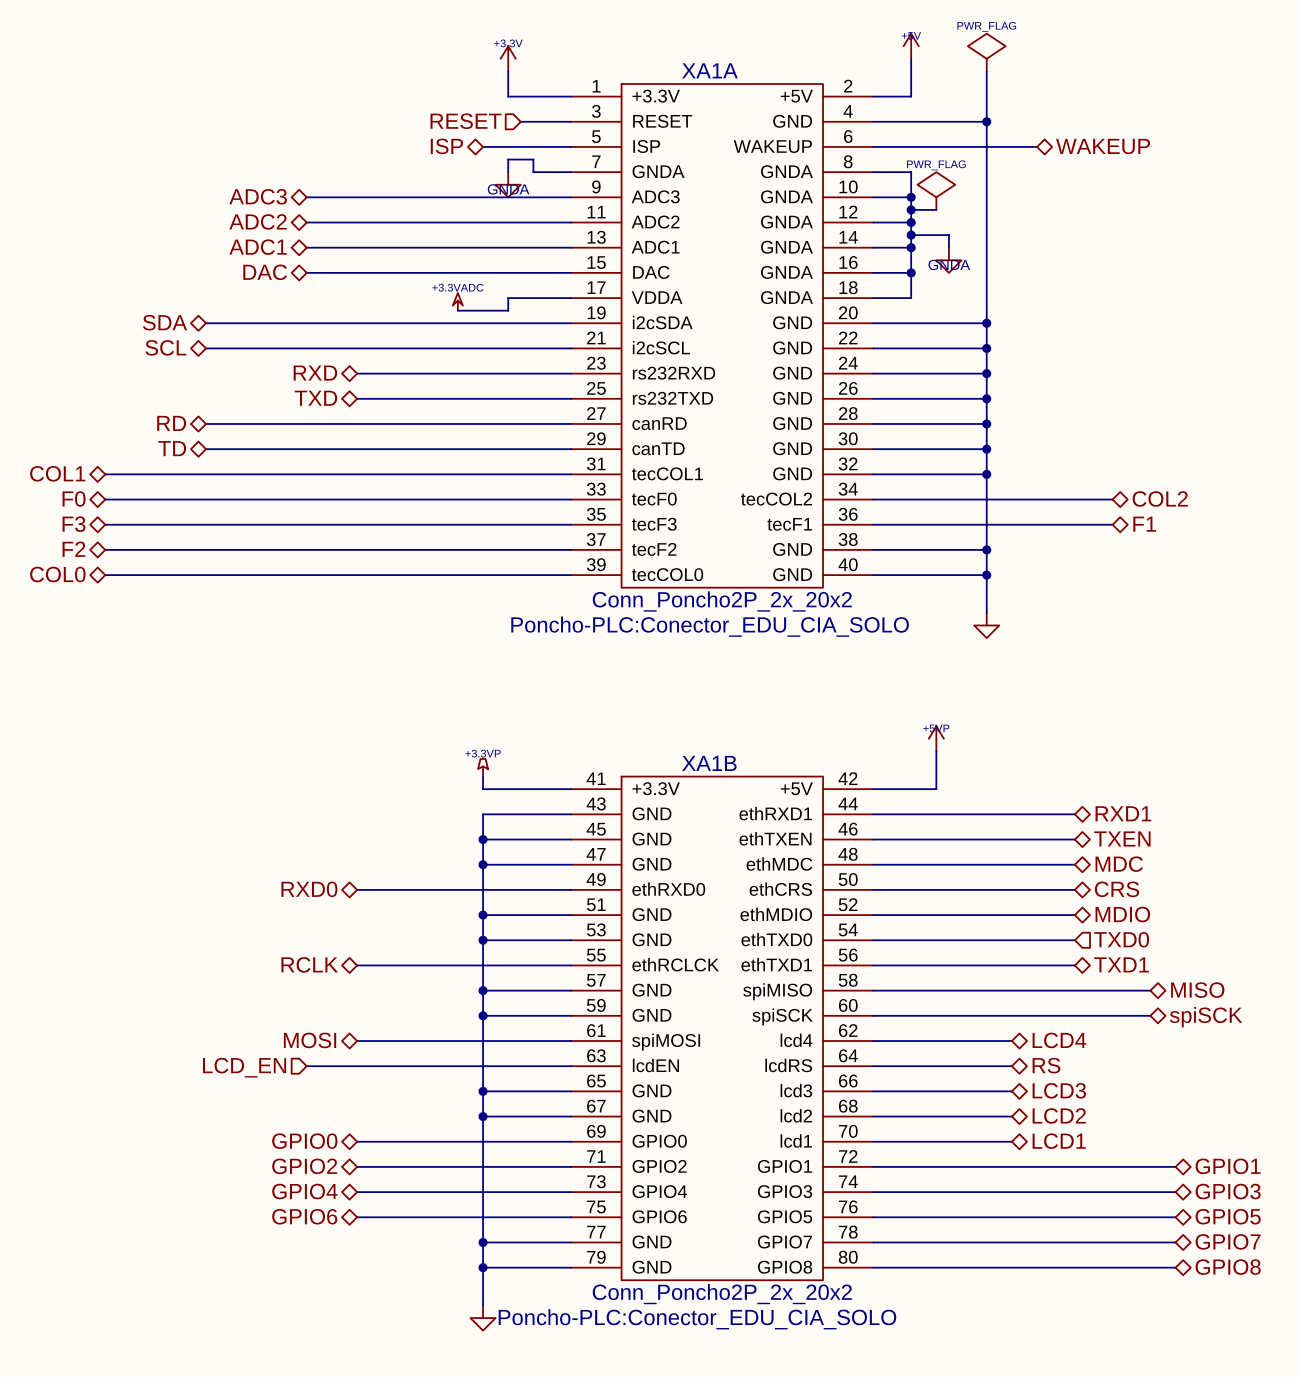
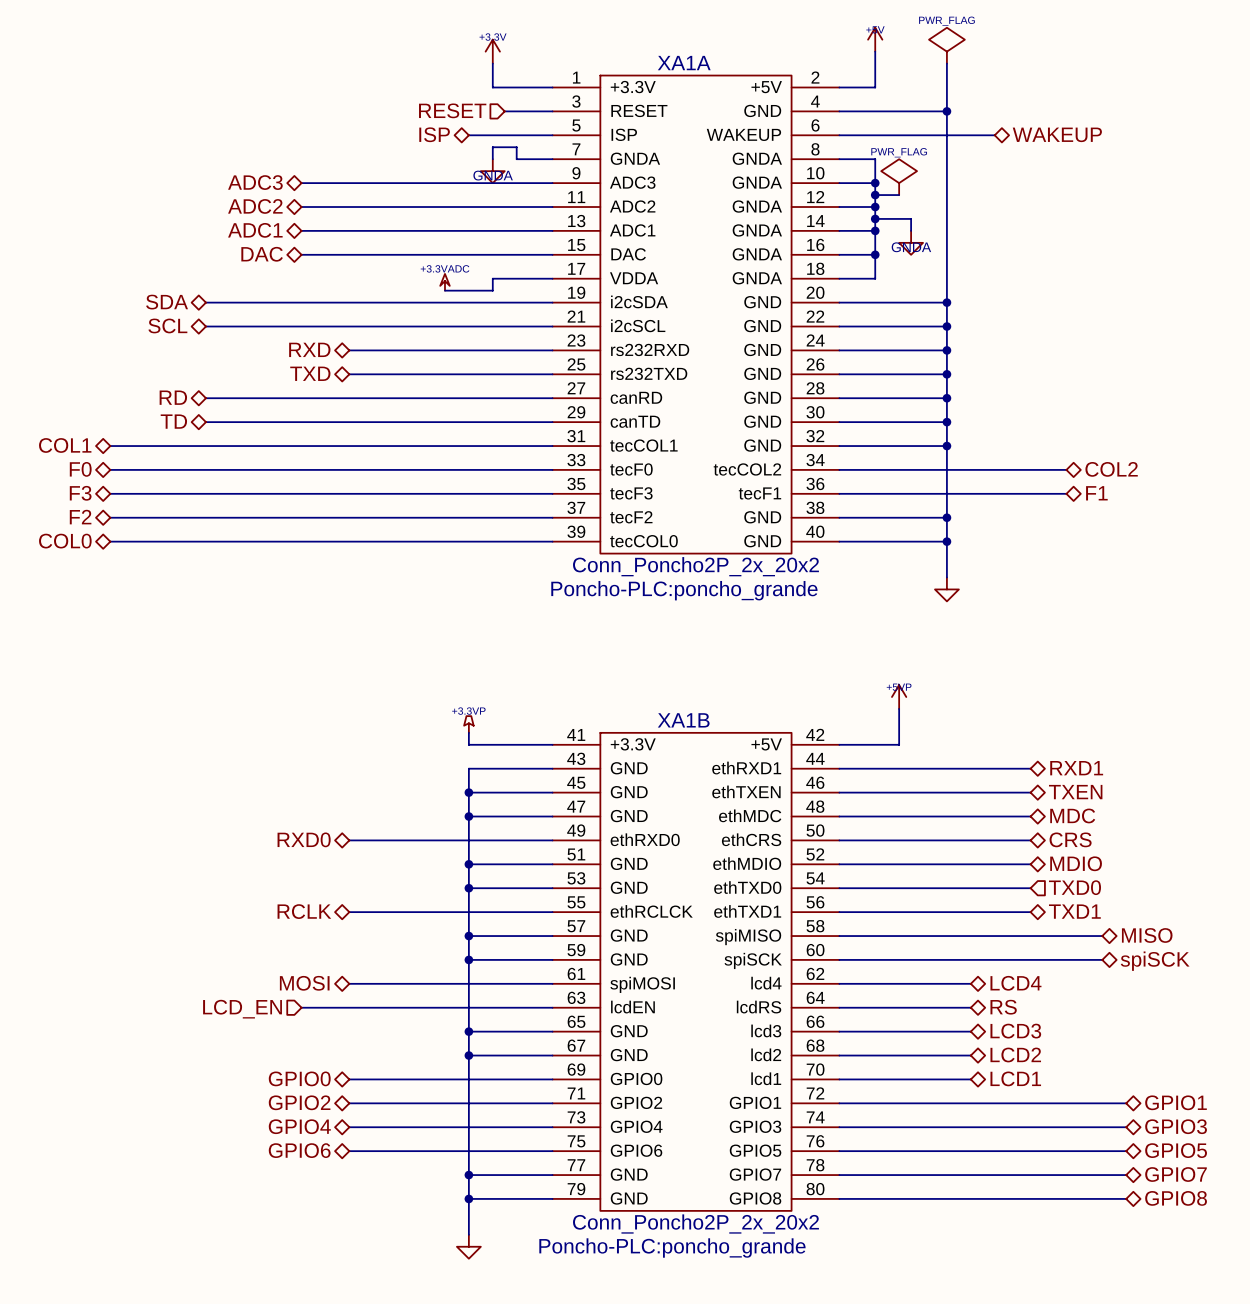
XA1A text: Poncho-PLC:Conector_EDU_CIA_SOLO (710, 626) -> Poncho-PLC:poncho_grande (684, 590)
XA1B text: Poncho-PLC:Conector_EDU_CIA_SOLO (697, 1319) -> Poncho-PLC:poncho_grande (672, 1248)

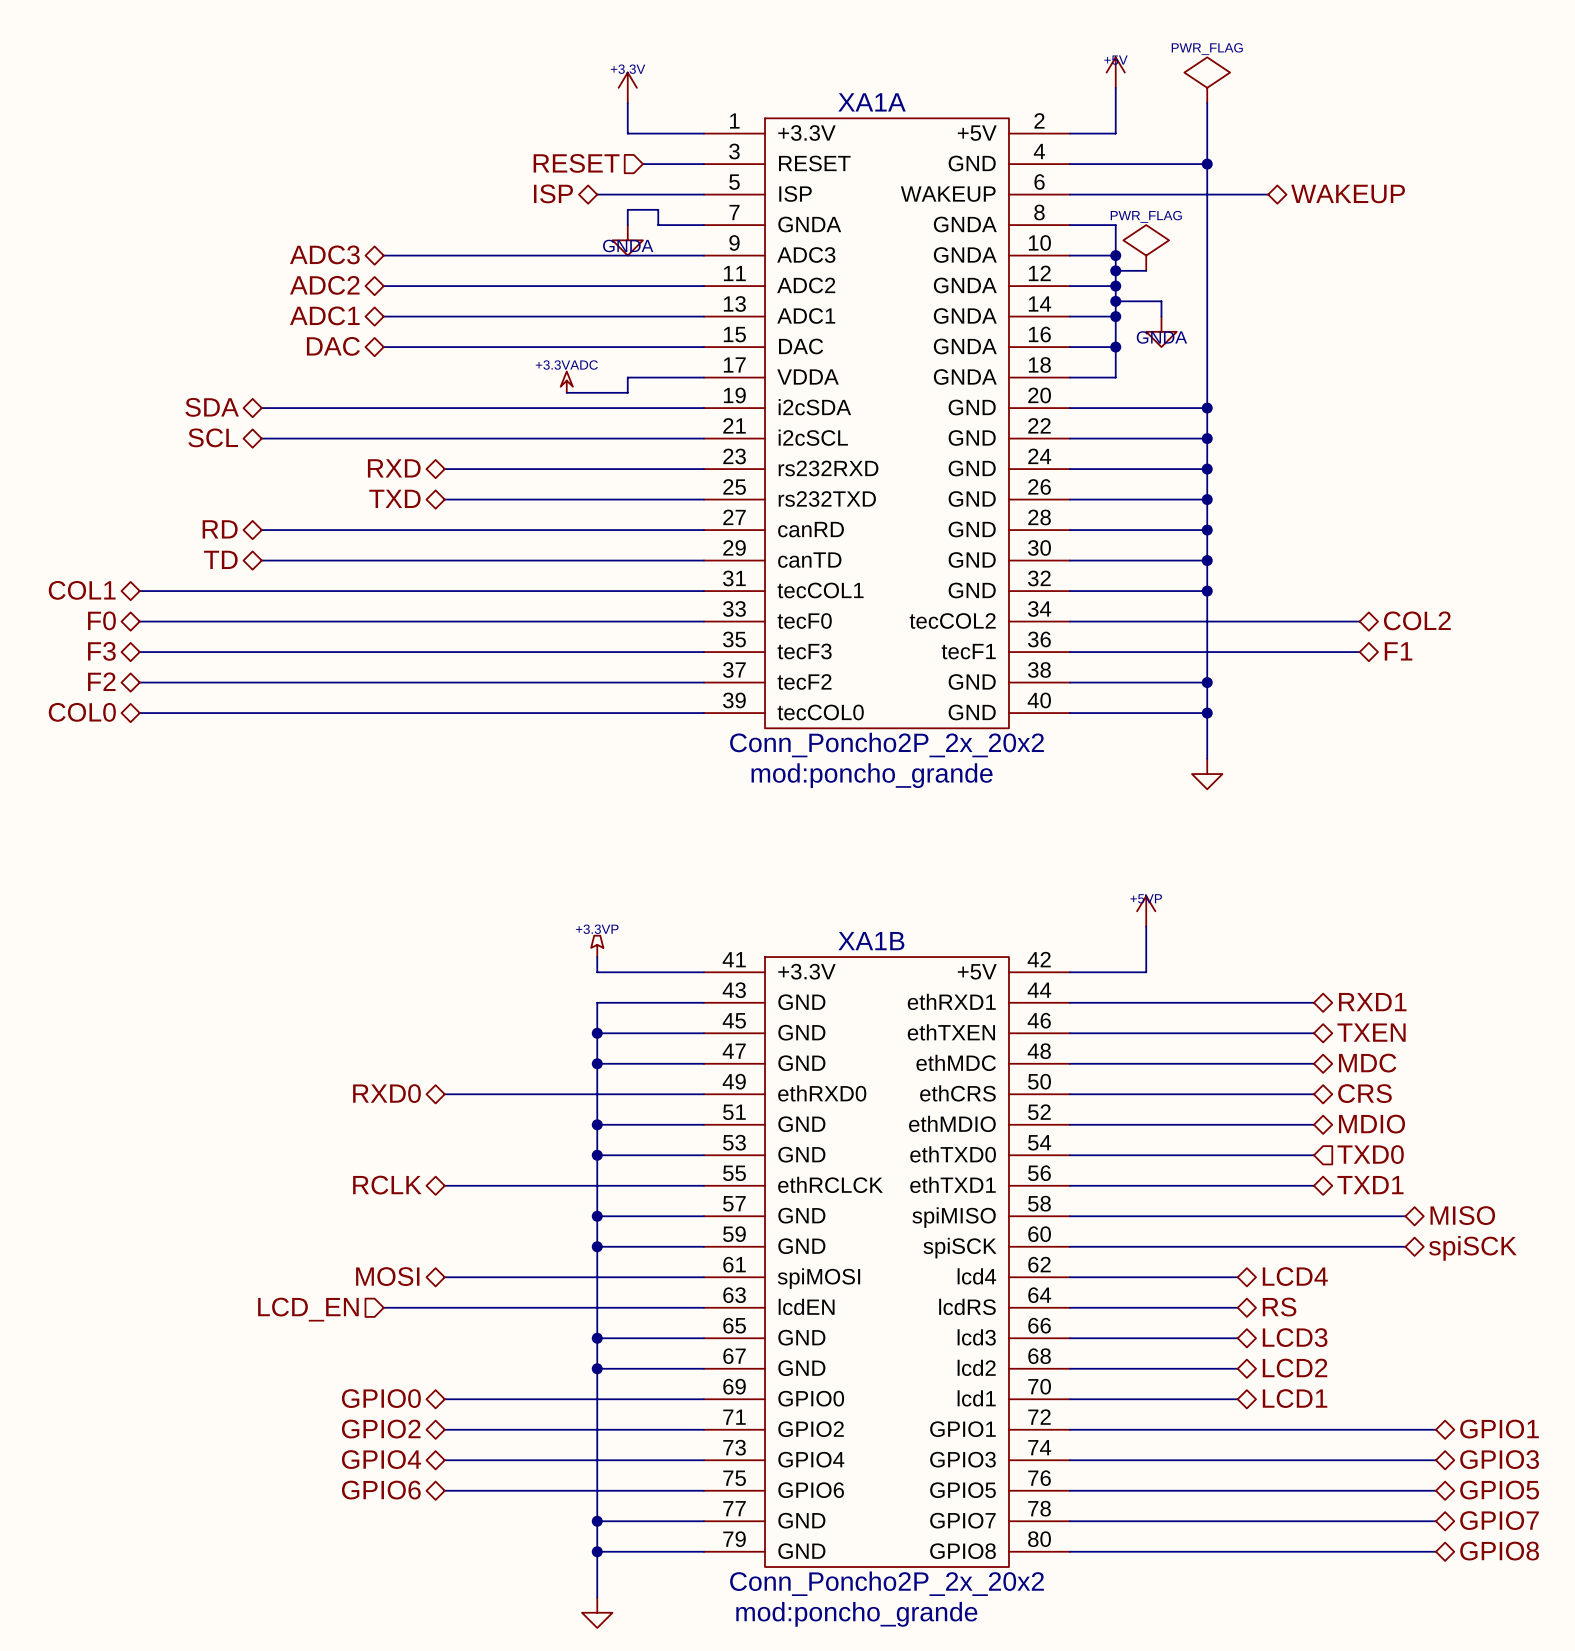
XA1A text: Poncho-PLC:poncho_grande (684, 590) -> mod:poncho_grande (872, 775)
XA1B text: Poncho-PLC:poncho_grande (672, 1248) -> mod:poncho_grande (856, 1614)

